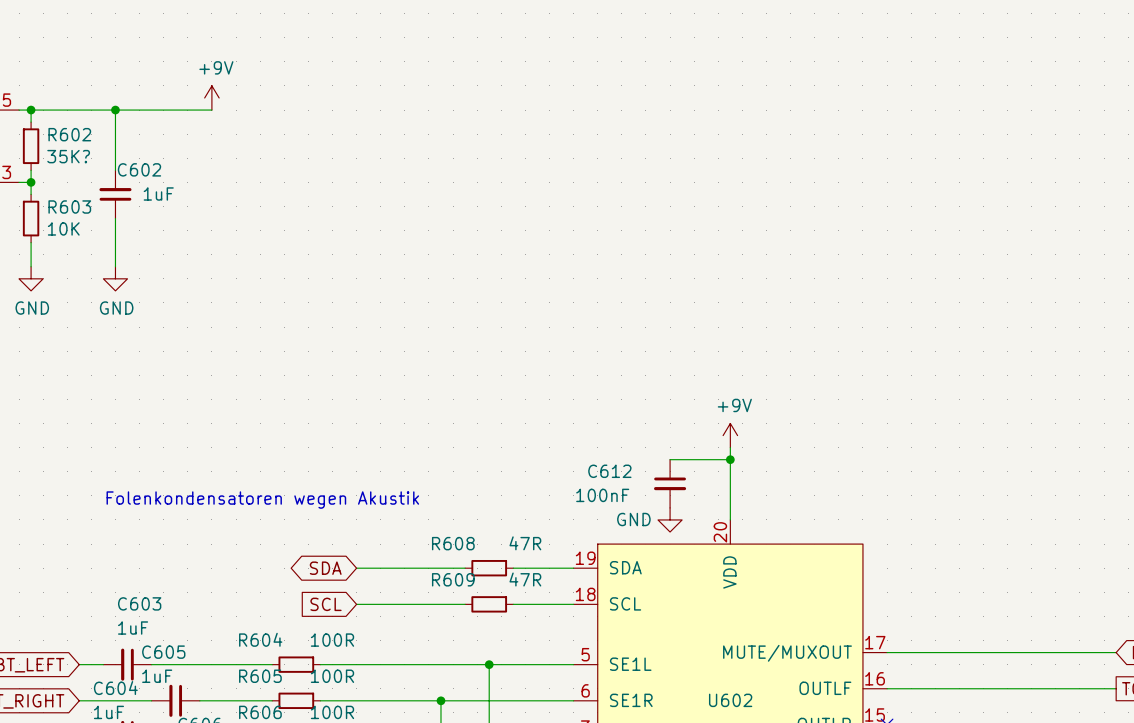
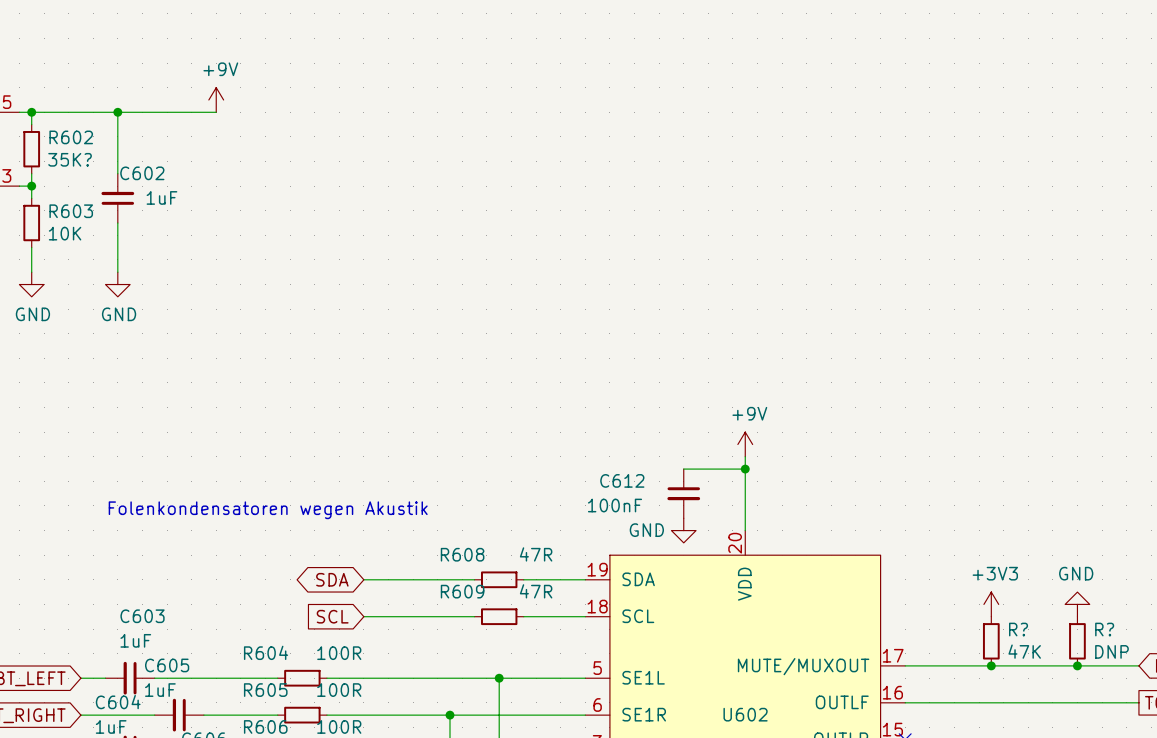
power symbol: none -> +3V3 (991, 604)
power symbol: none -> GND (1077, 604)
R?: none -> 47K (991, 641)
R?: none -> DNP (1077, 641)
junction: none -> (991, 665)
junction: none -> (1077, 665)

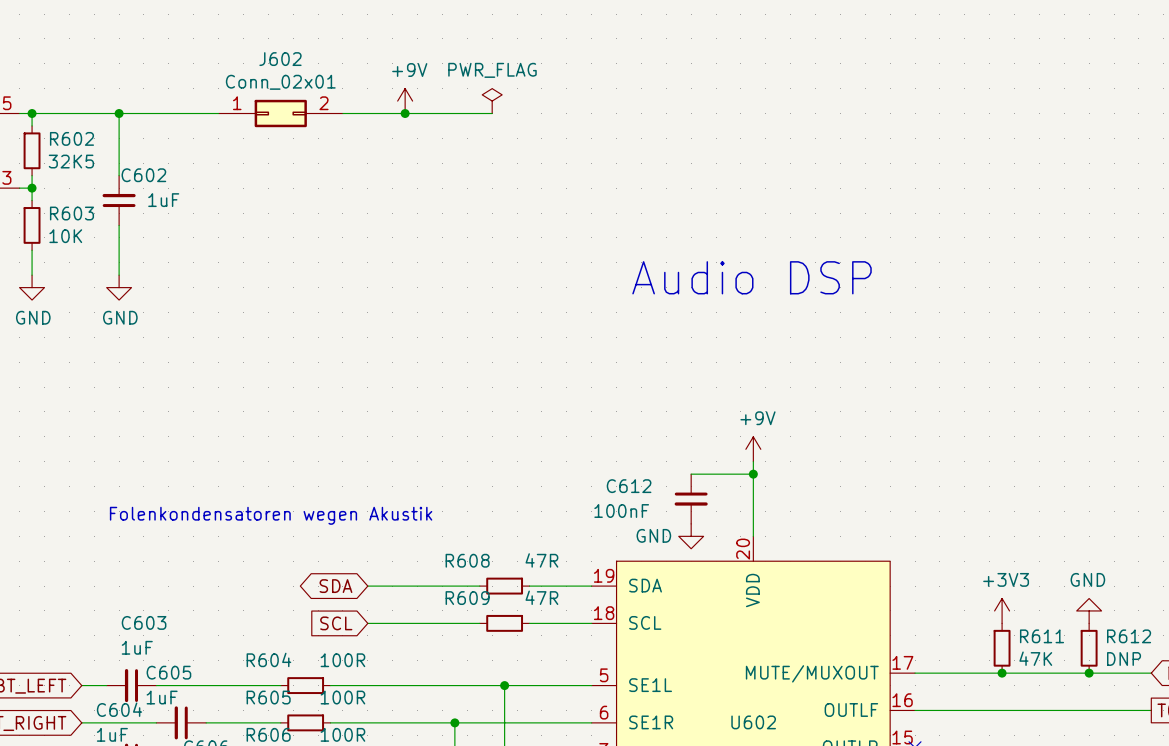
power symbol position: +9V (216, 99) -> +9V (405, 101)
power symbol: none -> PWR_FLAG (492, 101)
J602: none -> Conn_02x01 (280, 113)
wire: none -> (342, 113) (492, 113)
junction: none -> (405, 113)
R602 value: 35K? (70, 159) -> 32K5 (71, 161)
text: none -> Audio DSP (752, 277)
R? name: R? (1018, 629) -> R611 (1042, 636)
R? name: R? (1104, 629) -> R612 (1129, 636)

